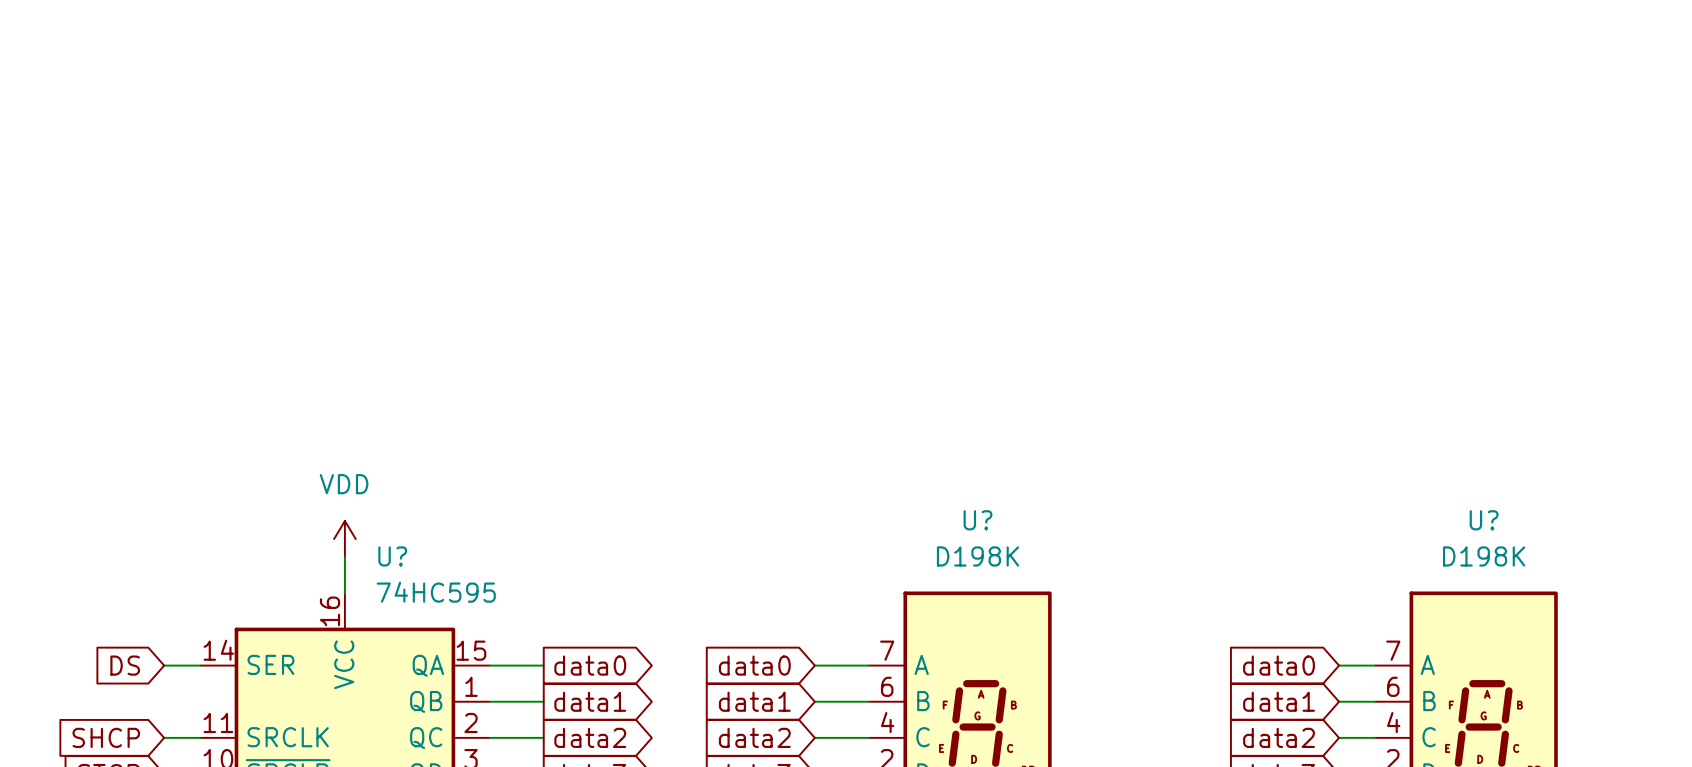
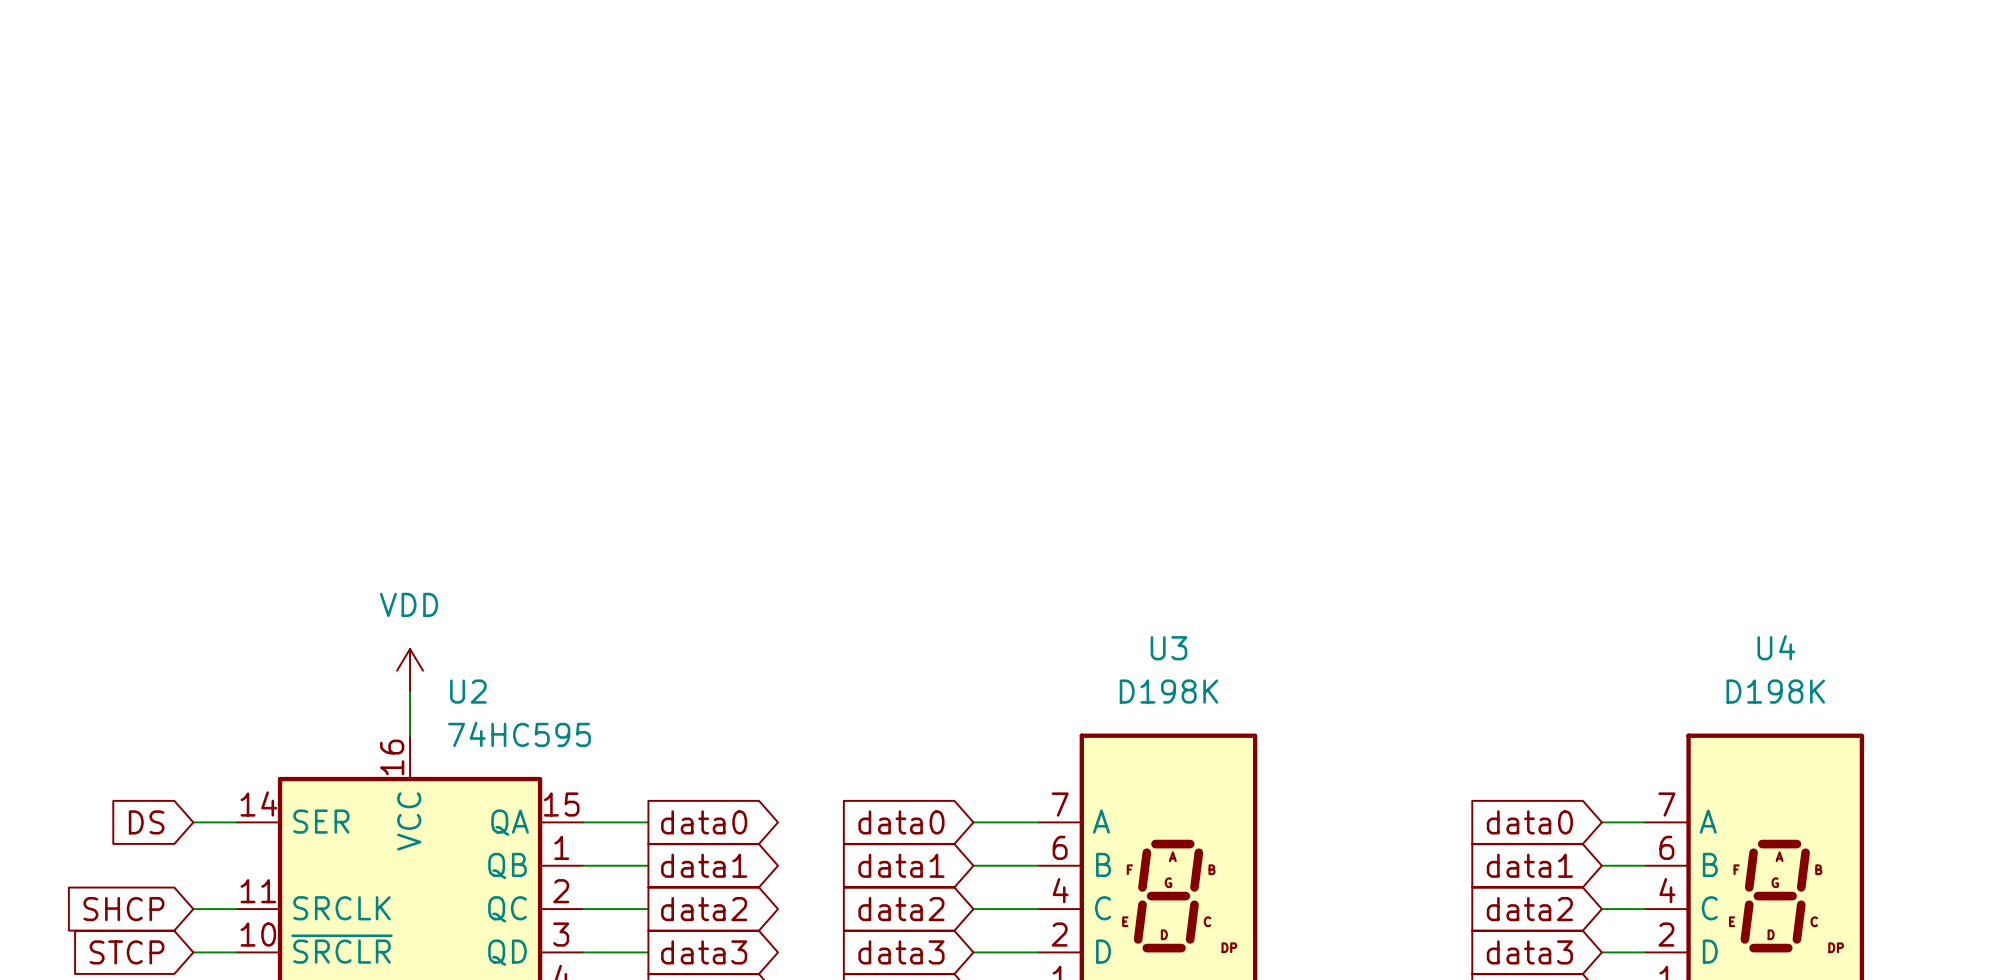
U? name: U? (977, 520) -> U3 (1169, 648)
U? name: U? (1484, 520) -> U4 (1776, 647)
U? name: U? (392, 556) -> U2 (468, 691)

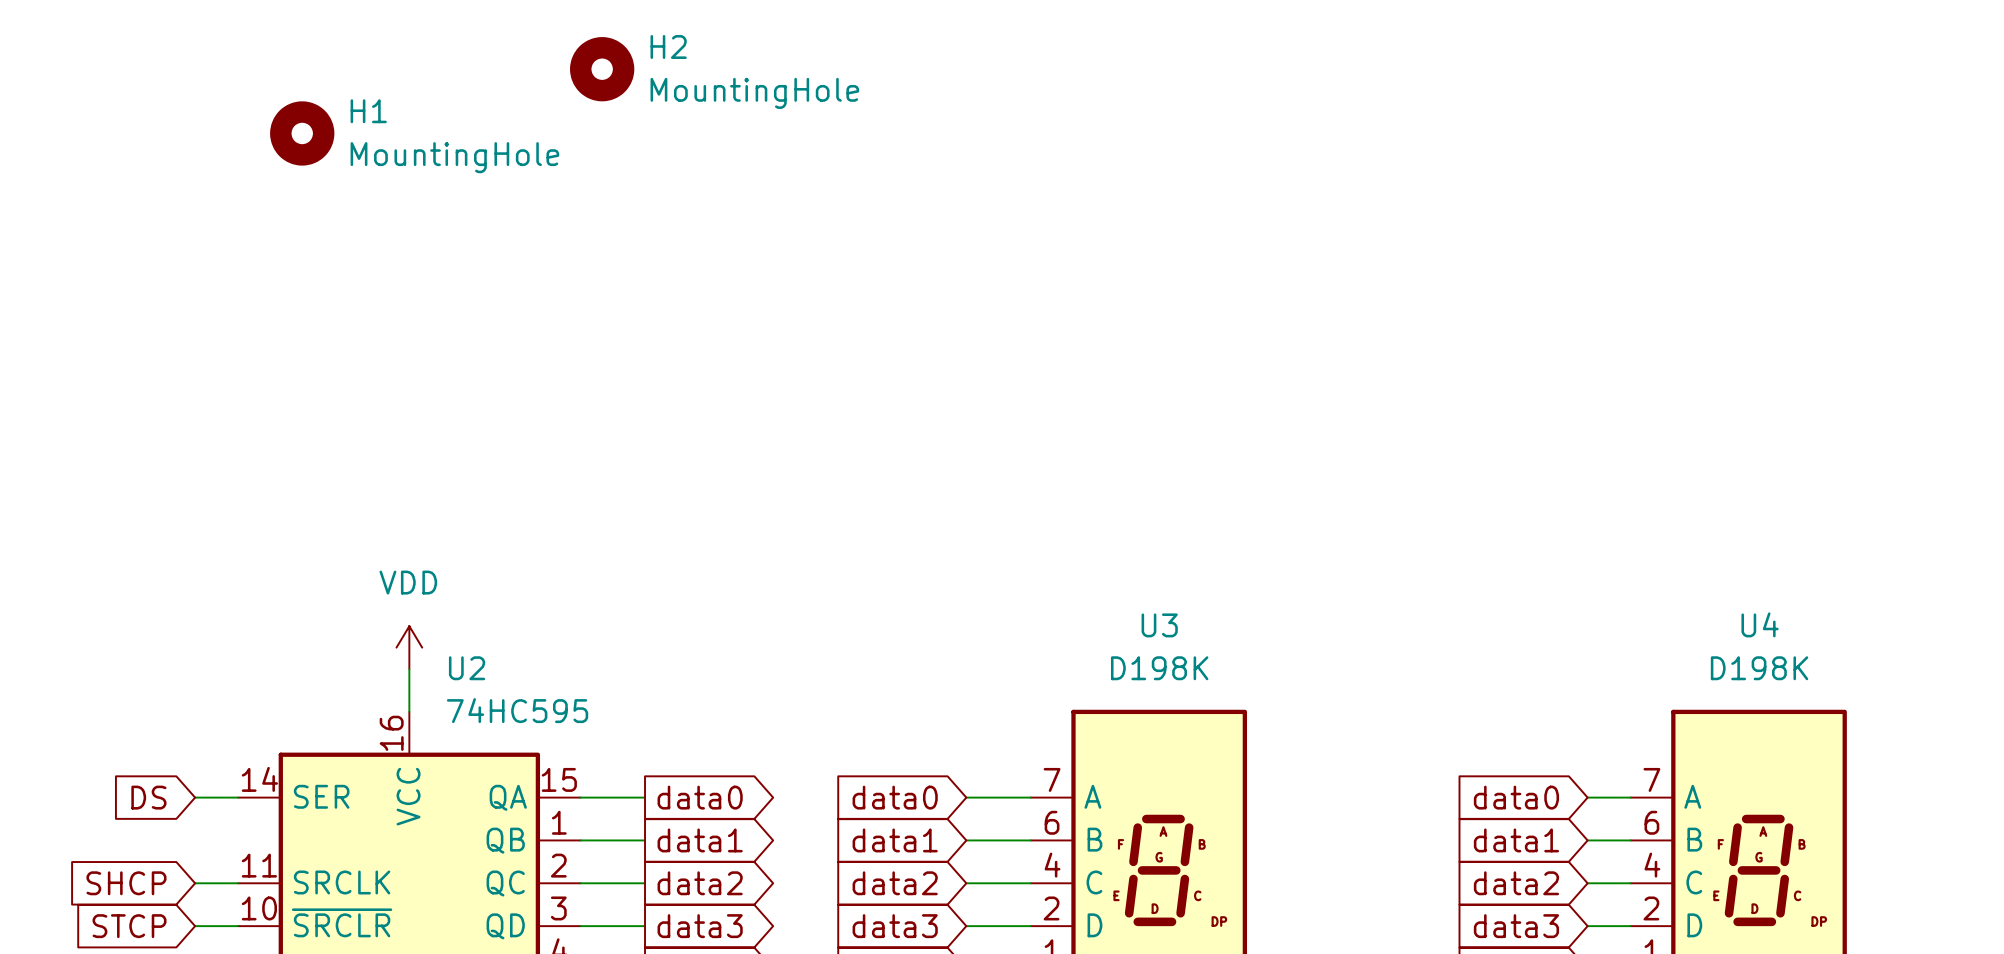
H2: none -> MountingHole (602, 69)
H1: none -> MountingHole (302, 133)

